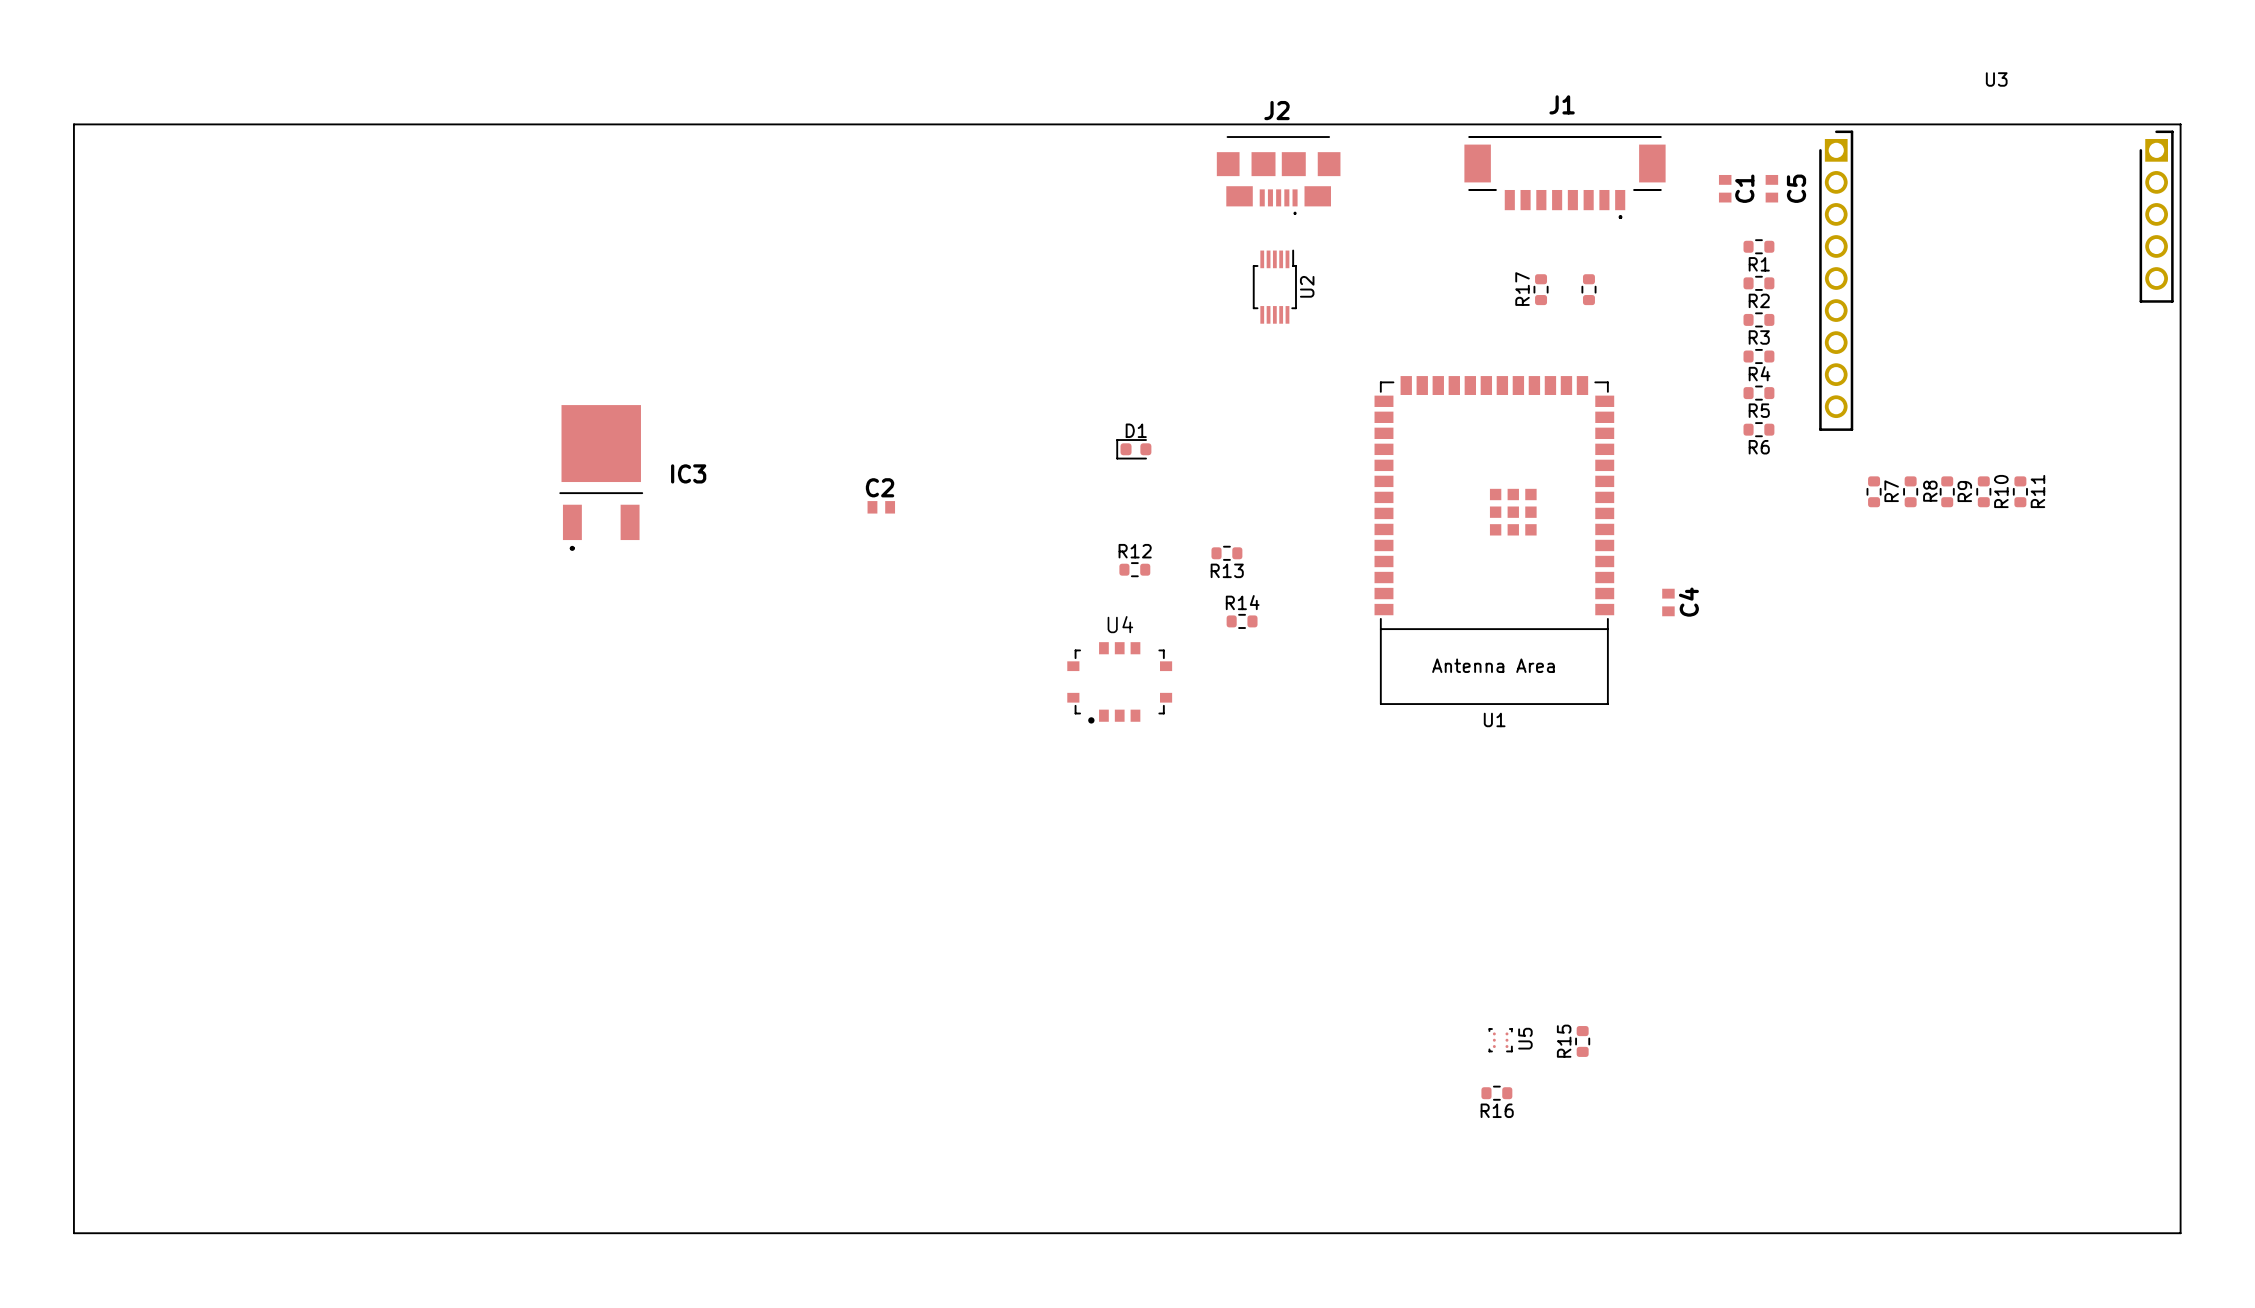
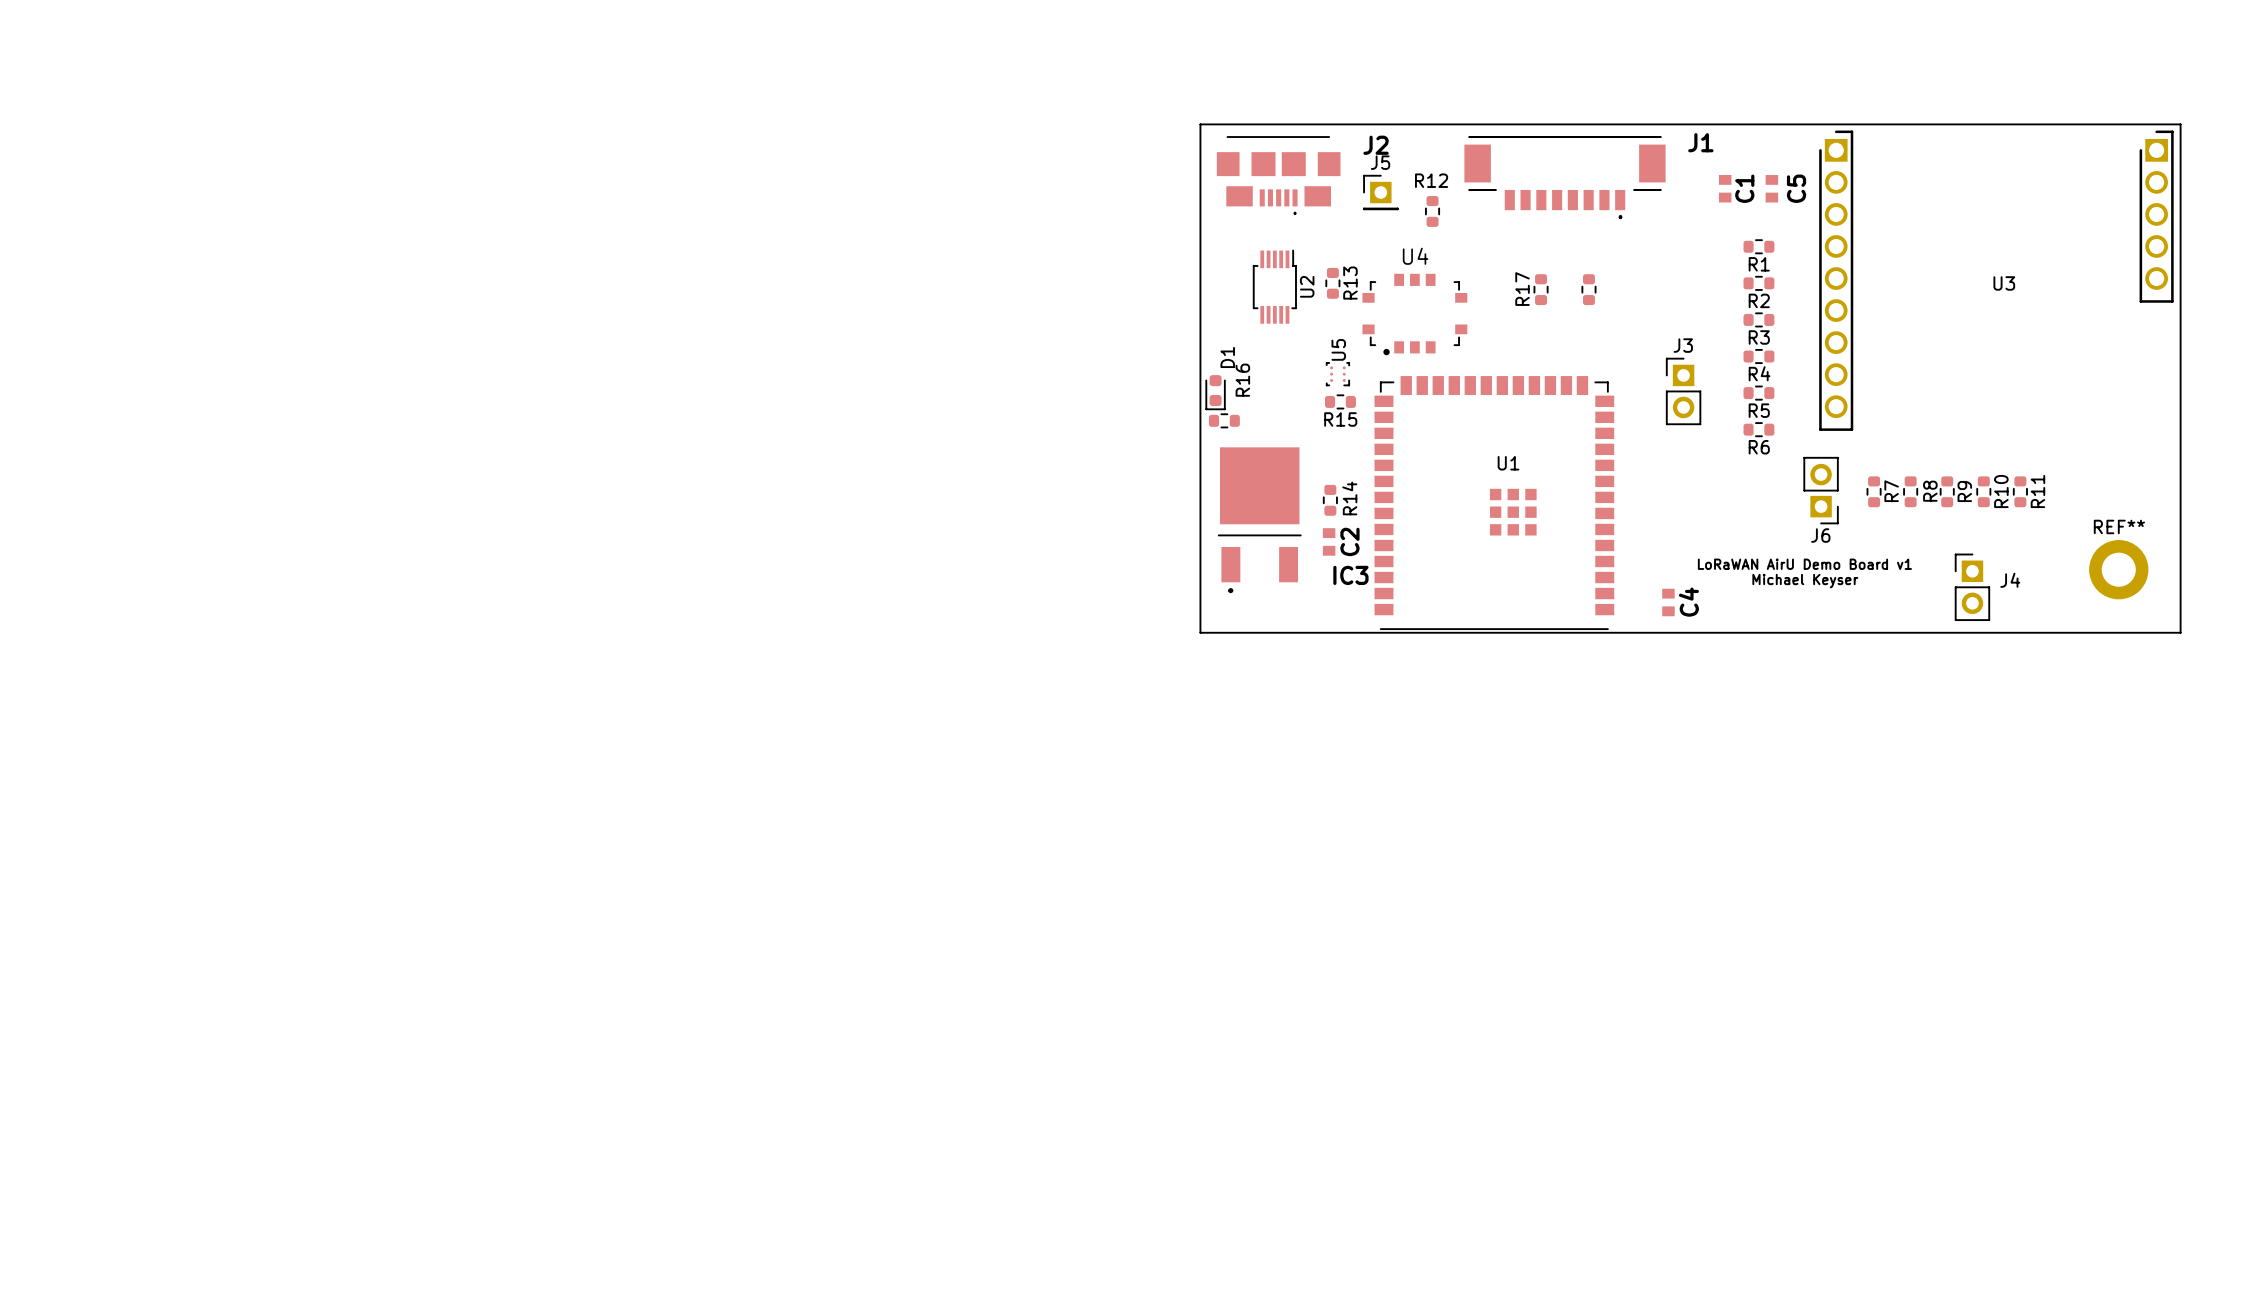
U3 name position: U3 (1996, 79) -> U3 (2004, 283)
J1 name position: J1 (1562, 104) -> J1 (1700, 142)
J2 name position: J2 (1277, 110) -> J2 (1376, 145)
board edge: (1200, 124) (73, 124) (73, 1233) (2180, 1233) (2180, 632) -> (1200, 124) (1200, 632) (2180, 632)
J5: none -> (1380, 192)
U1 footprint: [1374, 376, 1615, 705] -> [1374, 376, 1615, 630]
J3: none -> (1683, 391)
D1 rotation: 0° (1133, 449) -> 90° counterclockwise (1215, 392)
D1 position: (1133, 449) -> (1215, 392)
IC3 name position: IC3 (688, 473) -> IC3 (1350, 575)
IC3 position: (601, 477) -> (1259, 520)
J6: none -> (1821, 490)
C2 rotation: 0° (881, 507) -> 90° clockwise (1329, 541)
C2 position: (881, 507) -> (1329, 541)
R13 rotation: 0° (1226, 553) -> 90° clockwise (1332, 283)
R13 position: (1226, 553) -> (1332, 283)
text: none -> LoRaWAN AirU Demo Board v1 (1804, 564)
R12 rotation: 0° (1134, 569) -> 90° clockwise (1432, 211)
R12 position: (1134, 569) -> (1432, 211)
REF**: none -> (2118, 569)
R13 name position: R13 (1227, 570) -> R13 (1350, 283)
text: none -> Michael Keyser (1805, 581)
J4: none -> (1972, 587)
R14 rotation: 0° (1242, 621) -> 90° clockwise (1330, 500)
R14 position: (1242, 621) -> (1330, 500)
U4 position: (1119, 682) -> (1414, 314)
U1 name position: U1 (1494, 719) -> U1 (1508, 463)
U5 name position: U5 (1525, 1038) -> U5 (1338, 349)
U5 position: (1500, 1040) -> (1337, 374)
R15 name position: R15 (1564, 1041) -> R15 (1340, 419)
R15 rotation: 0° (1582, 1041) -> 90° clockwise (1340, 401)
R15 position: (1582, 1041) -> (1340, 401)
R16 position: (1496, 1093) -> (1224, 420)
R16 name rotation: 0° (1497, 1110) -> 90° counterclockwise (1242, 380)
R16 name position: R16 (1497, 1110) -> R16 (1242, 380)

